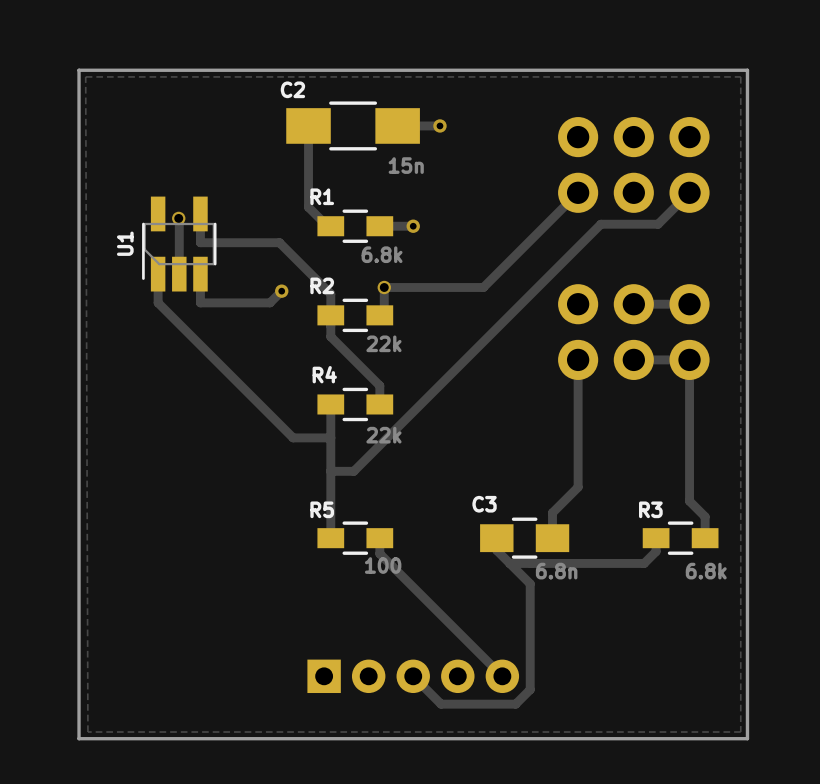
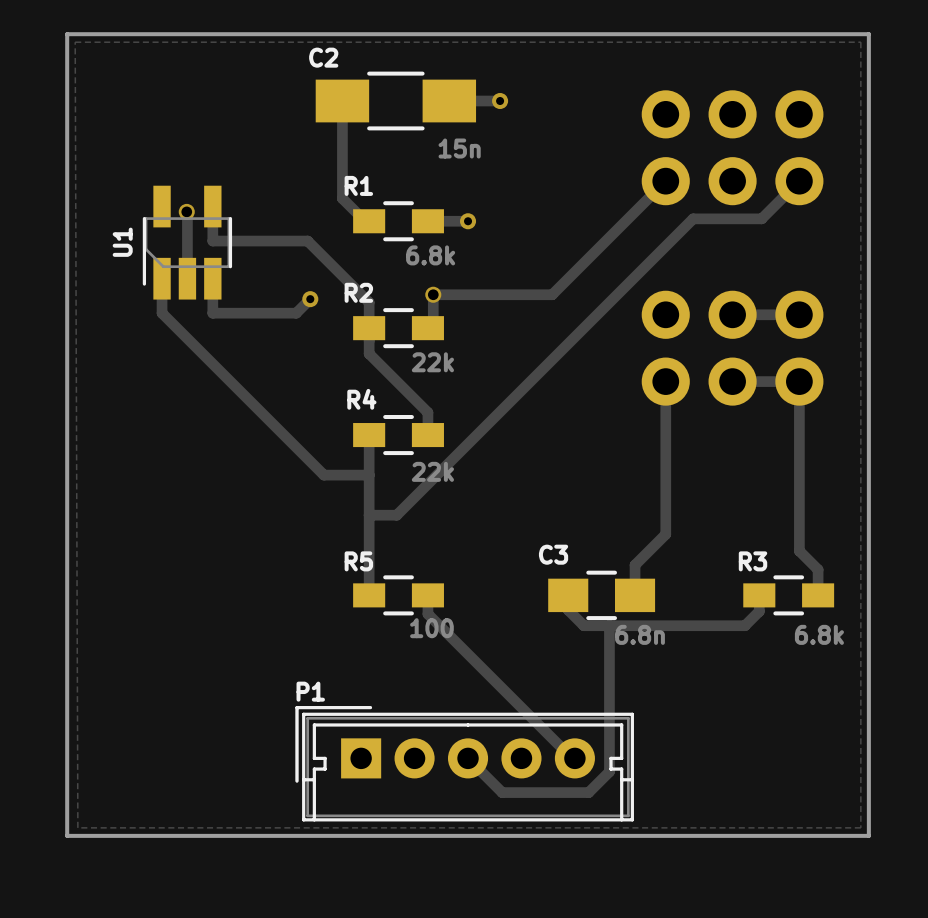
track: (509, 563) (530, 583) (530, 689) (515, 704) (441, 704) (413, 676) -> none
track: none -> (609, 625) (609, 771) (588, 792) (502, 792) (468, 758)
P1 side: bottom (413, 676) -> top (464, 763)

